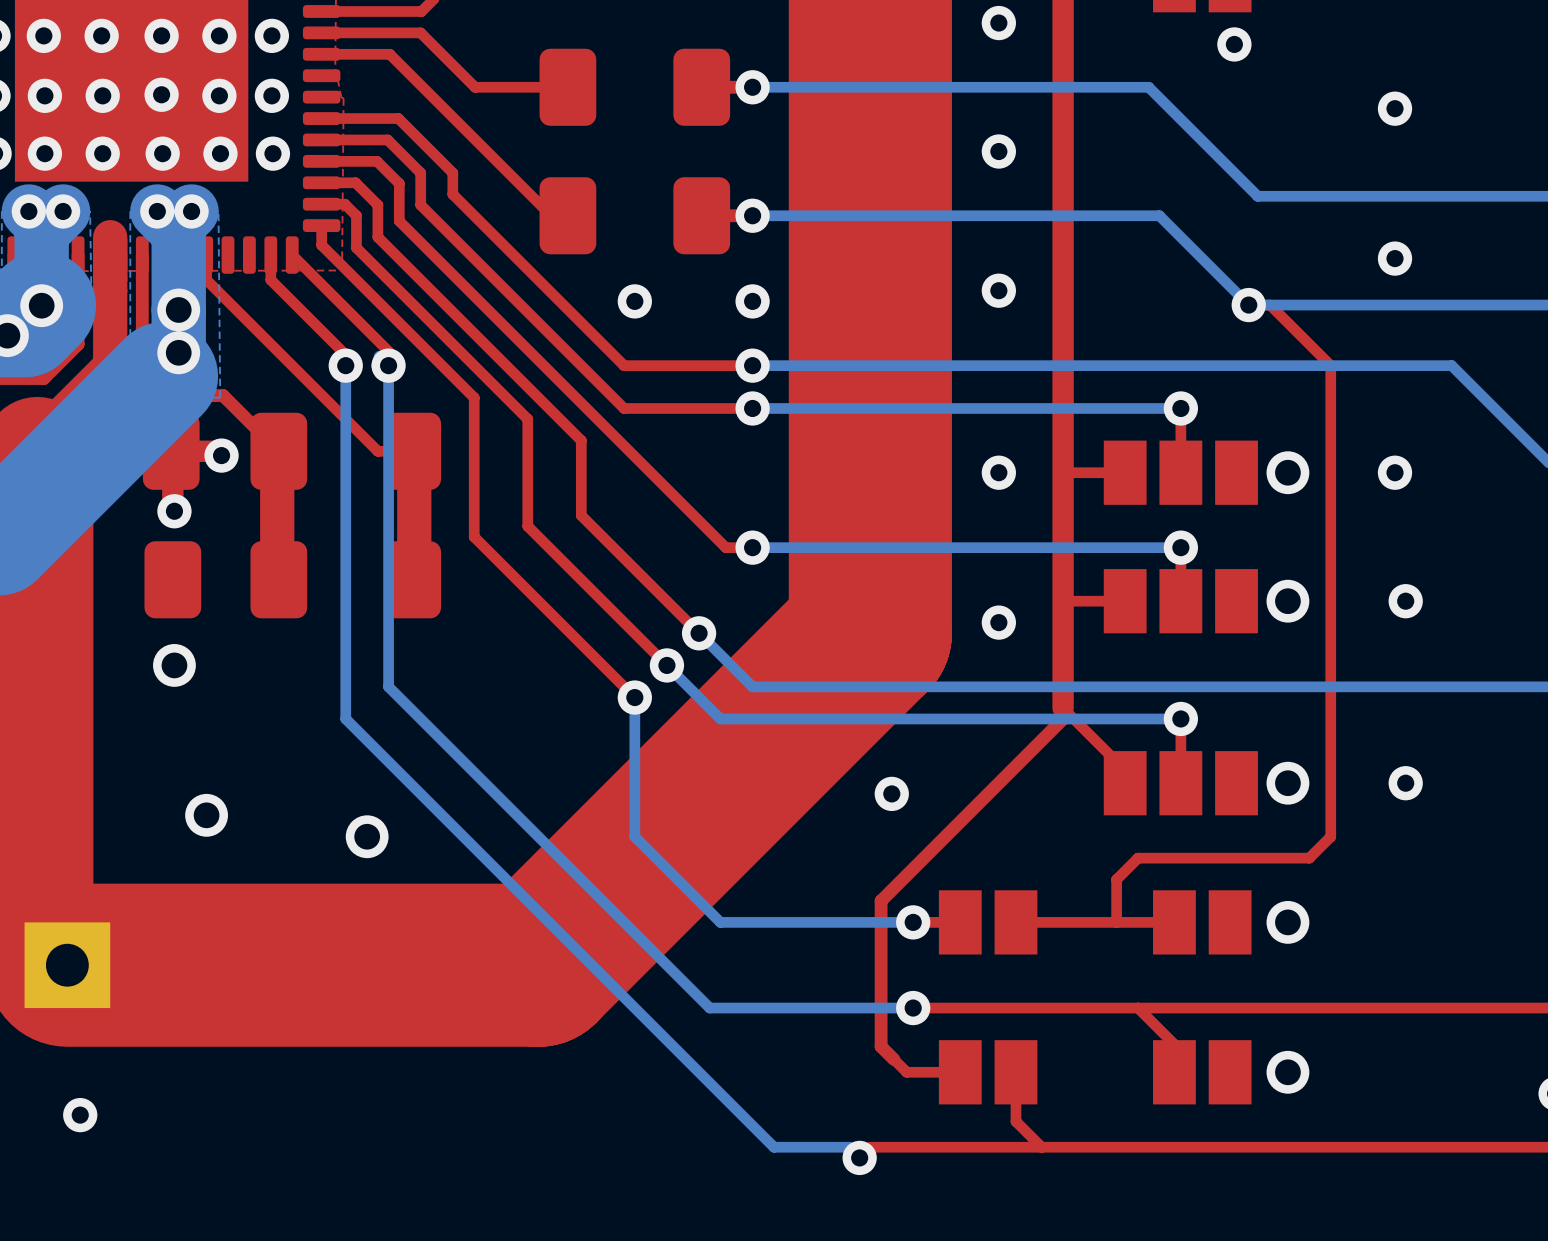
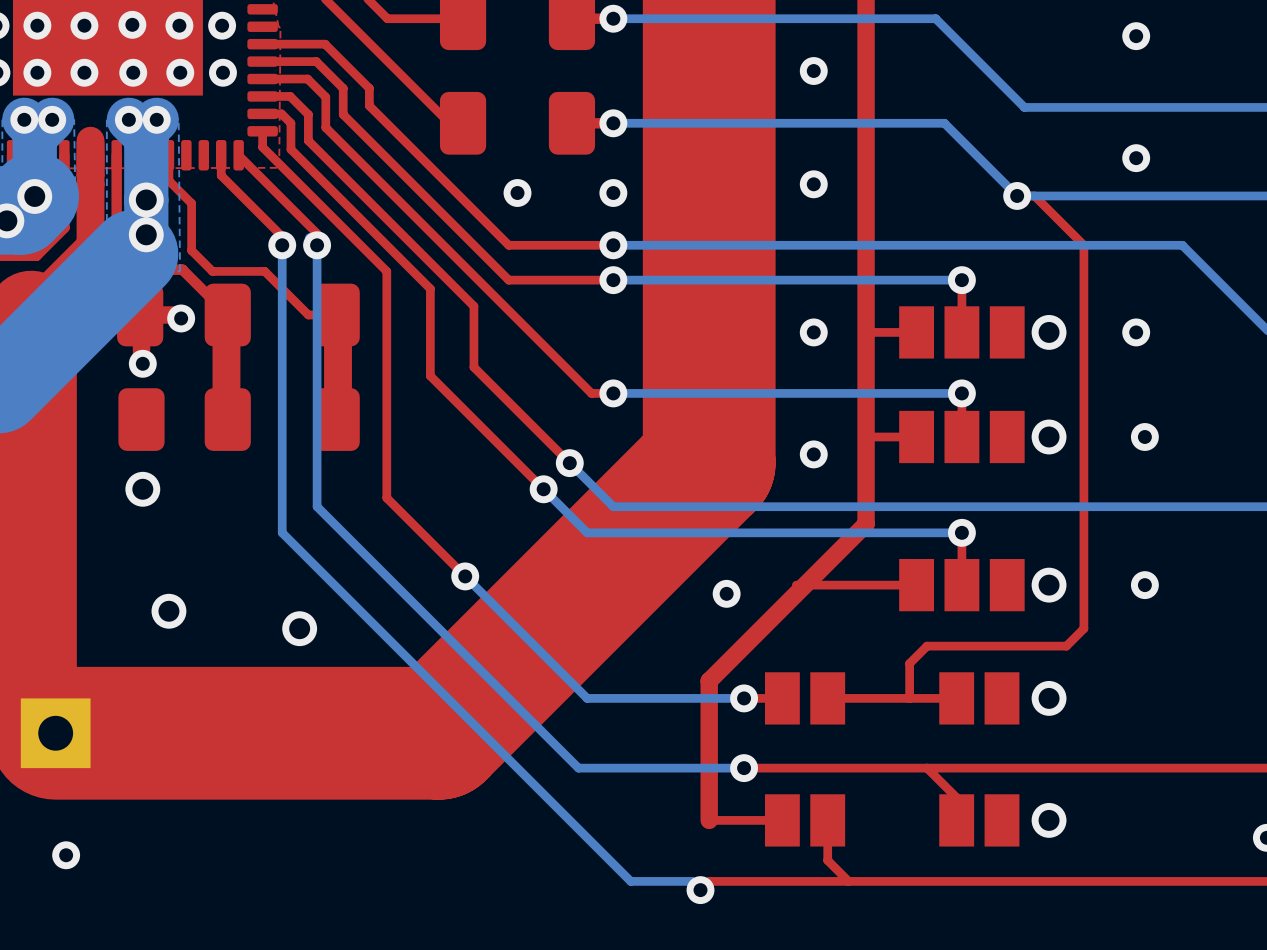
top track: (206, 280) (324, 397) -> (168, 175) (168, 180) (191, 203) (191, 250) (212, 271) (264, 271)
top track: (474, 536) (634, 697) -> (386, 384) (386, 497) (465, 576)
bottom track: (634, 697) (634, 836) -> (465, 576) (517, 628)
via position: (634, 697) -> (465, 576)
top track: (1125, 783) (1125, 770) (1063, 708) (1063, 718) (881, 900) (881, 1046) (906, 1072) -> (866, 524) (709, 680) (709, 820) (738, 820)
top track: none -> (916, 585) (796, 585)

